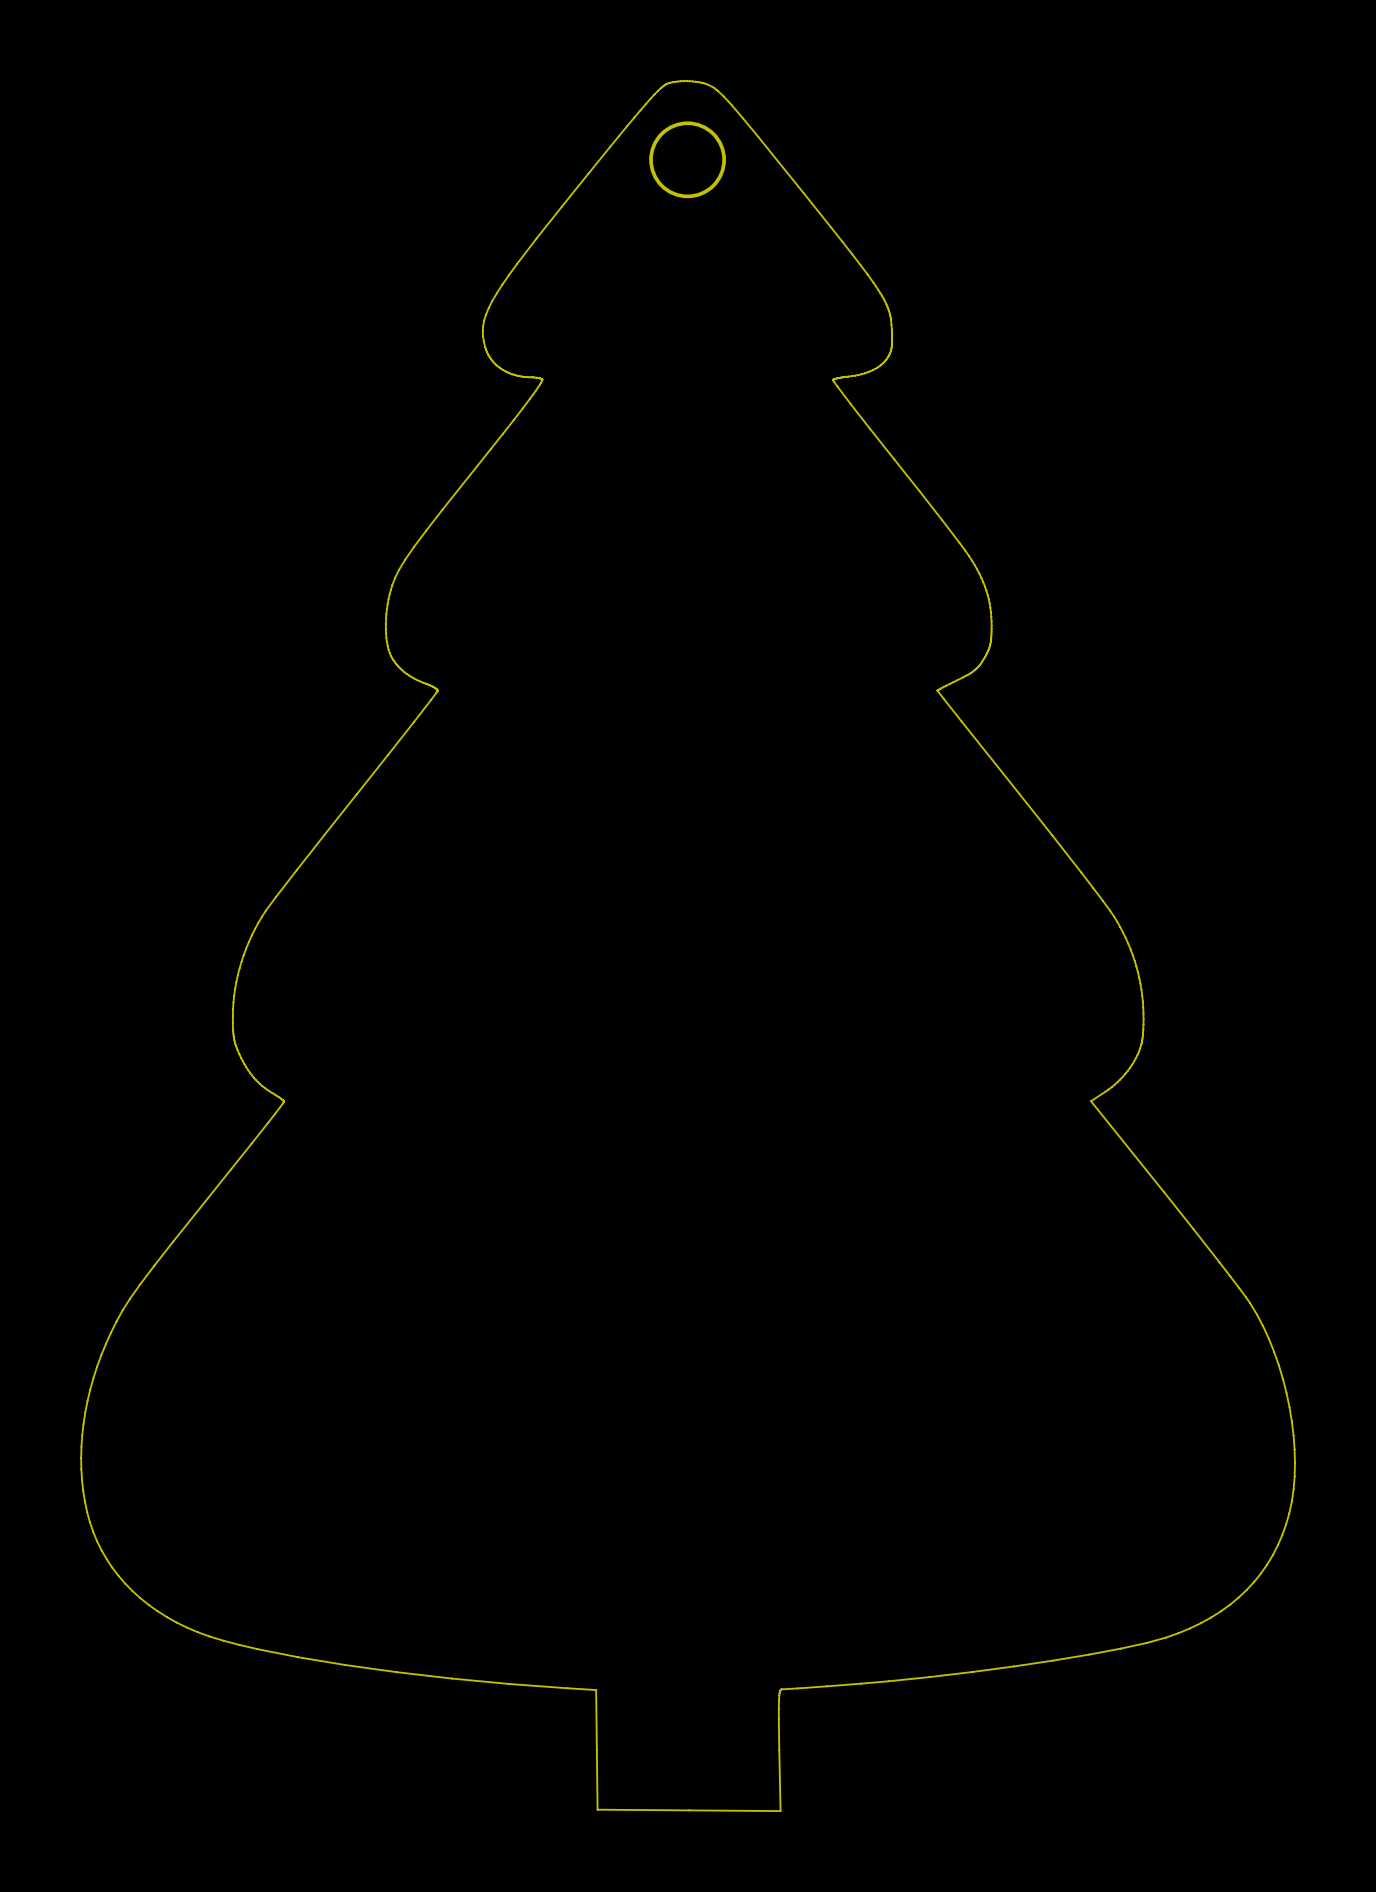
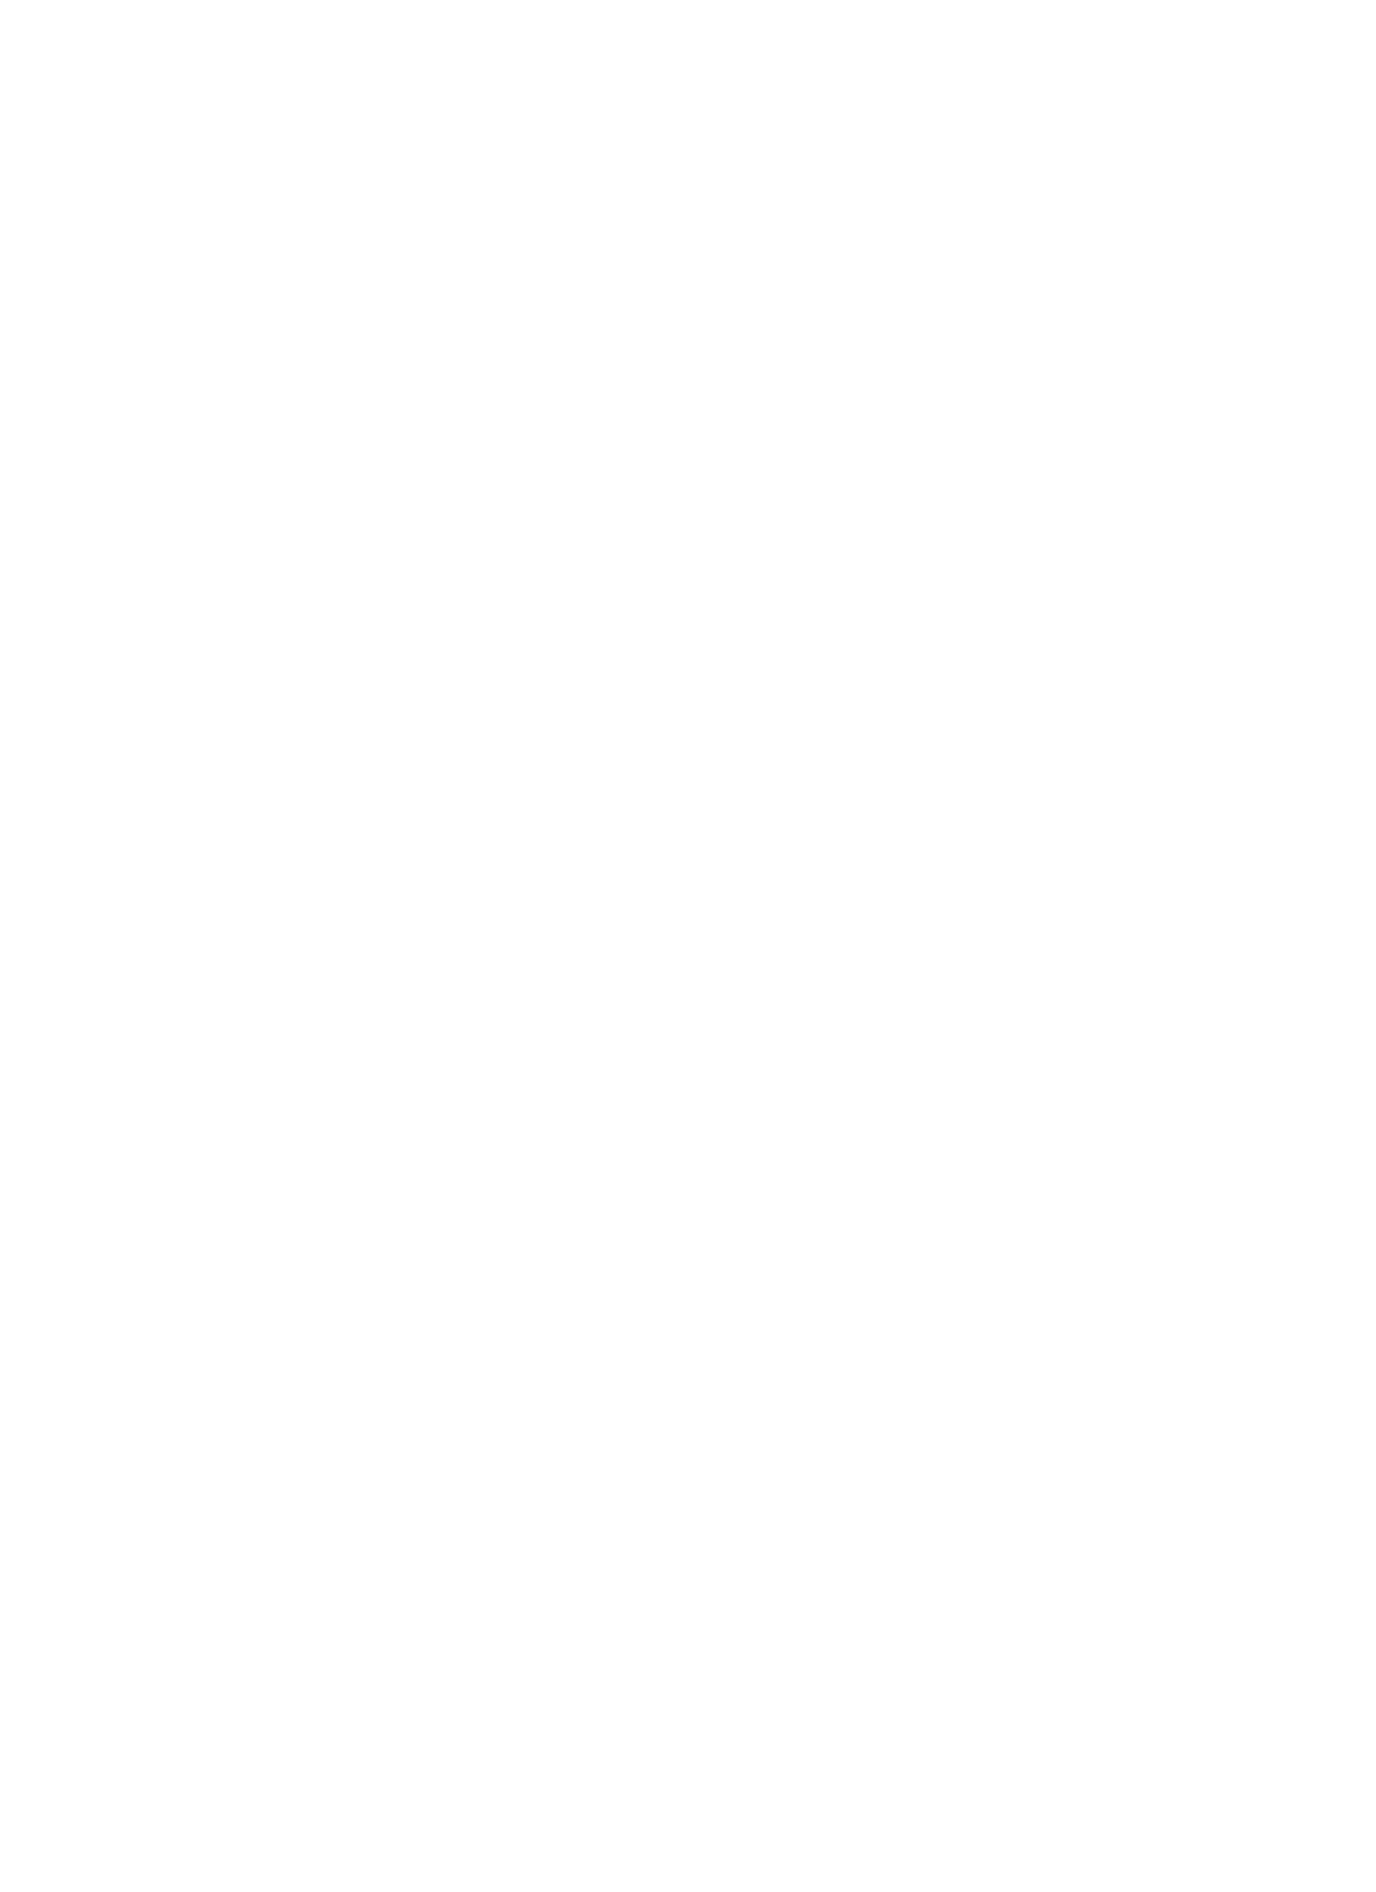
round board edge: [649, 121, 726, 199] -> none
board edge: (542, 379) (522, 408) (413, 547) (399, 569) (392, 585) (386, 619) (386, 637) (389, 652) (394, 662) (404, 672) (437, 690) -> none
board edge: (833, 379) (870, 371) (881, 364) (887, 357) (891, 347) (891, 332) (890, 315) (885, 301) (852, 254) (731, 105) (712, 86) (701, 82) (686, 81) (665, 84) (645, 104) (536, 238) (502, 284) (488, 308) (484, 320) (483, 336) (486, 350) (491, 359) (498, 366) (509, 373) (542, 379) -> none
board edge: (833, 379) (965, 550) (977, 569) (986, 590) (991, 626) (990, 642) (987, 652) (973, 671) (937, 690) -> none
board edge: (437, 690) (276, 896) (258, 922) (246, 948) (234, 995) (232, 1023) (234, 1042) (242, 1061) (253, 1077) (283, 1101) -> none
board edge: (937, 690) (1093, 887) (1123, 932) (1132, 955) (1140, 983) (1143, 1013) (1141, 1042) (1135, 1058) (1125, 1073) (1111, 1087) (1091, 1101) (1250, 1303) (1268, 1338) (1283, 1379) (1291, 1421) (1294, 1463) (1291, 1501) (1286, 1524) (1277, 1545) (1260, 1573) (1238, 1597) (1211, 1617) (1166, 1637) (1089, 1654) (930, 1677) (781, 1689) (778, 1708) (780, 1811) (597, 1809) (596, 1690) (451, 1678) (345, 1664) (239, 1644) (209, 1636) (176, 1622) (148, 1604) (125, 1583) (106, 1559) (93, 1531) (84, 1501) (81, 1469) (82, 1435) (87, 1401) (105, 1343) (130, 1298) (284, 1101) -> none

